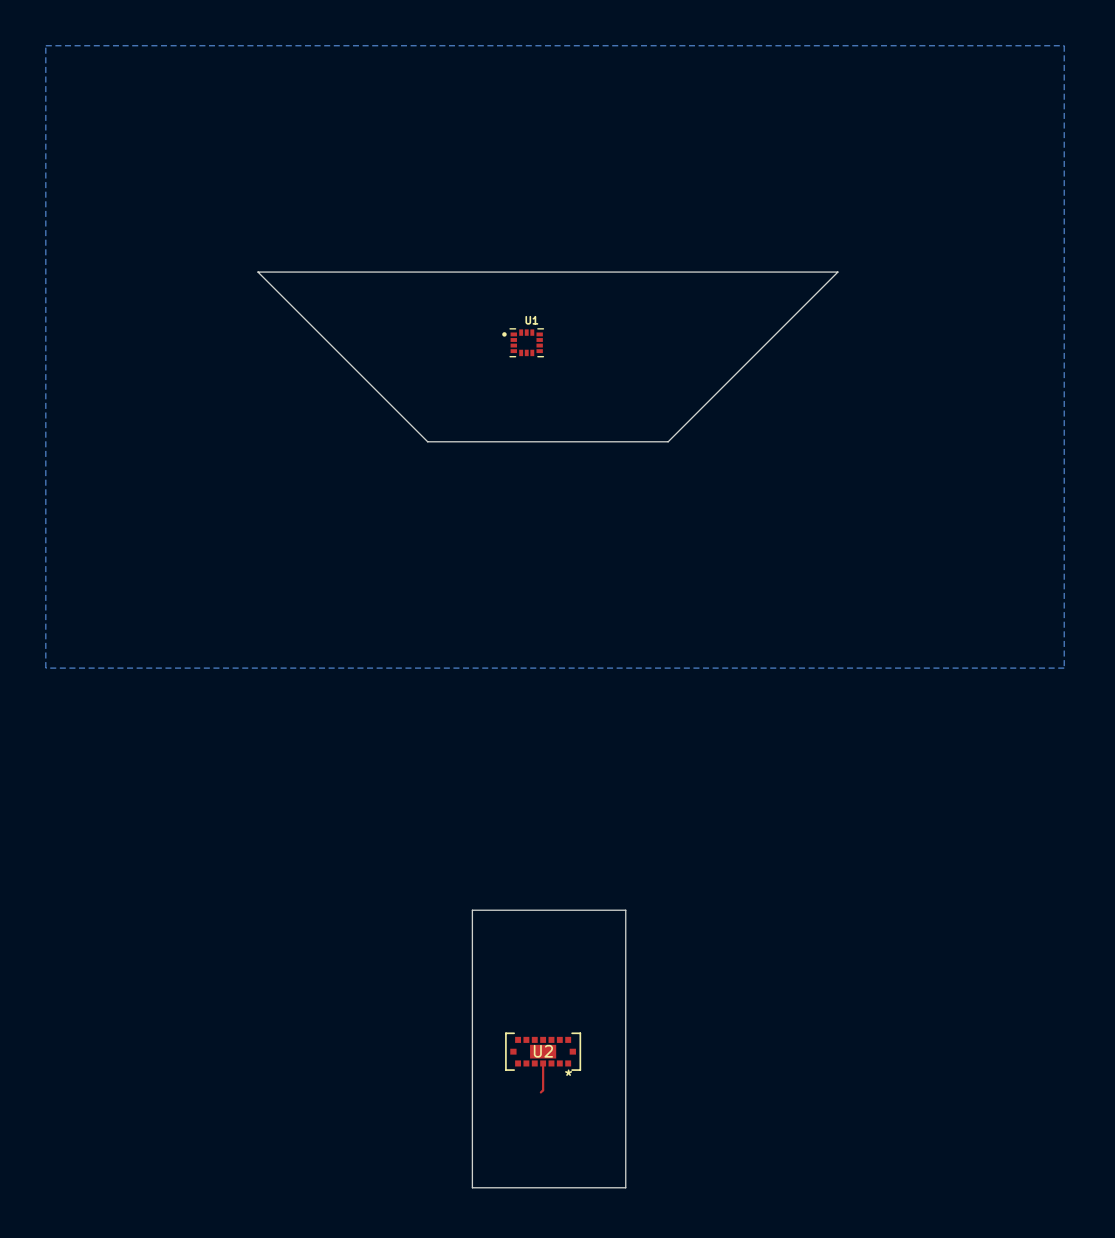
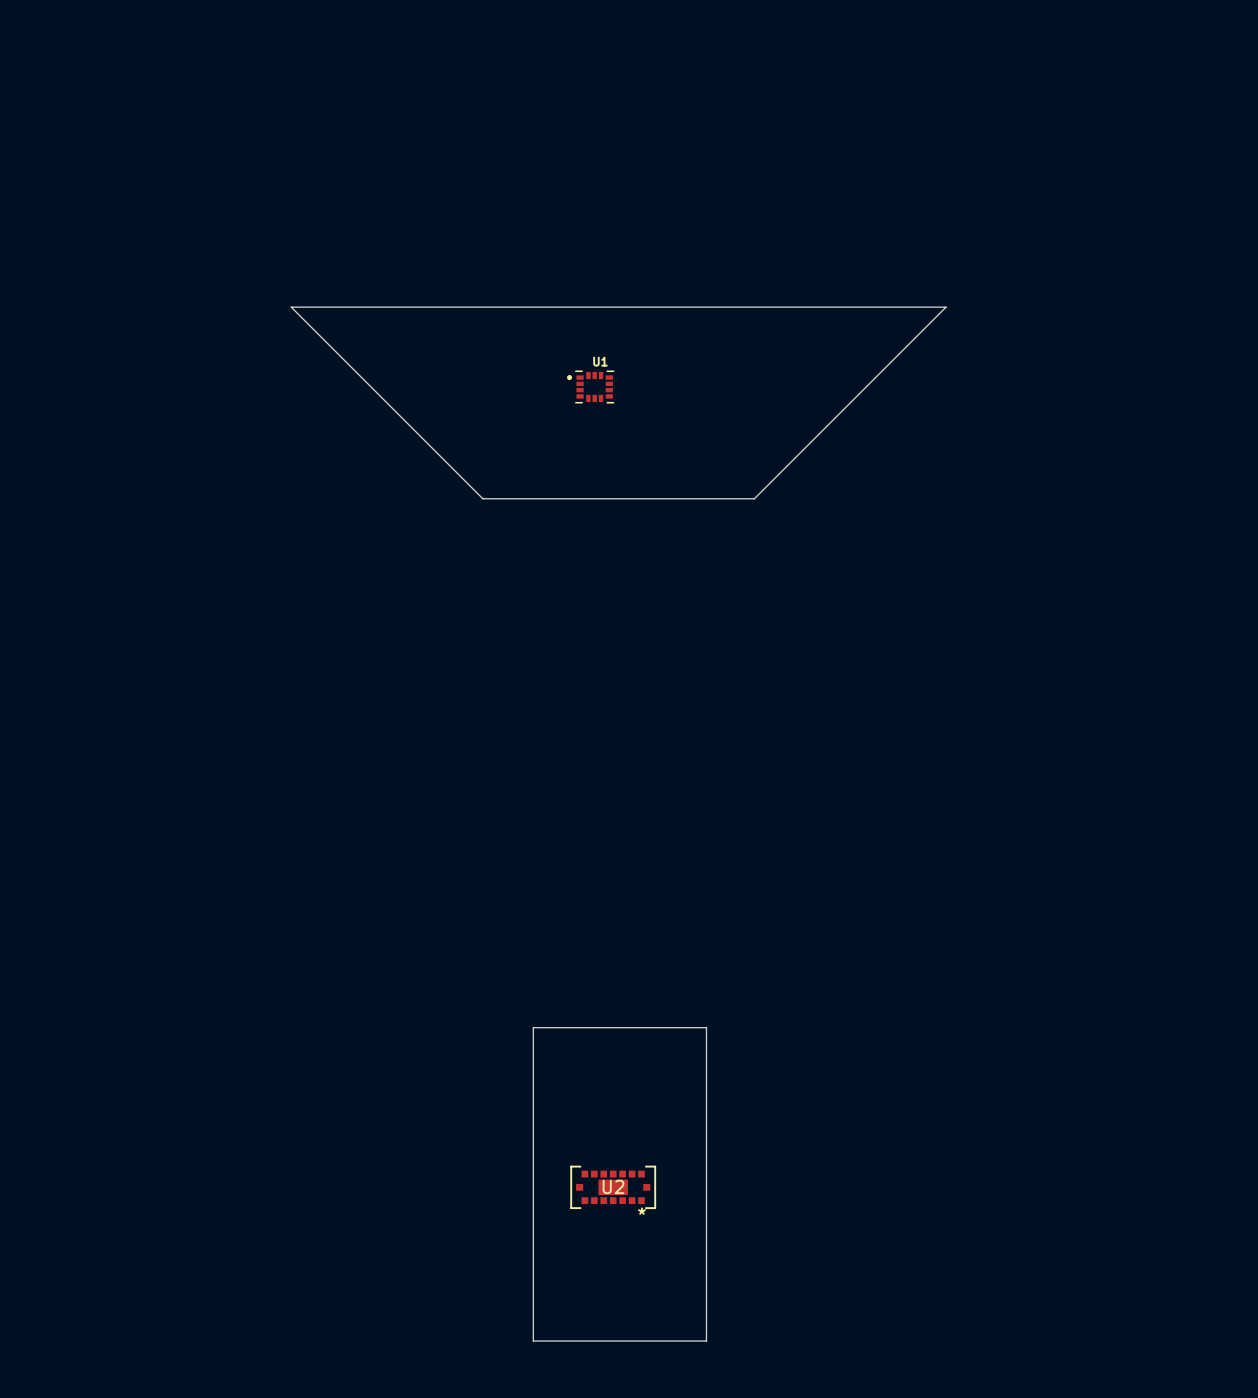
bottom zone outline: (45, 45) (1064, 45) (1064, 668) (45, 668) (45, 45) -> none
top track: (543, 1063) (543, 1090) (540, 1092) -> none

